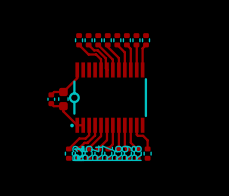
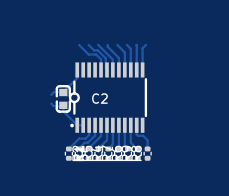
part: (79, 40) -> none
part: (88, 40) -> none
part: (98, 40) -> none
part: (107, 40) -> none
part: (117, 40) -> none
part: (126, 40) -> none
part: (136, 40) -> none
part: (146, 40) -> none
C2: none -> (63, 98)
part: (51, 99) -> none
part: (63, 99) -> none

